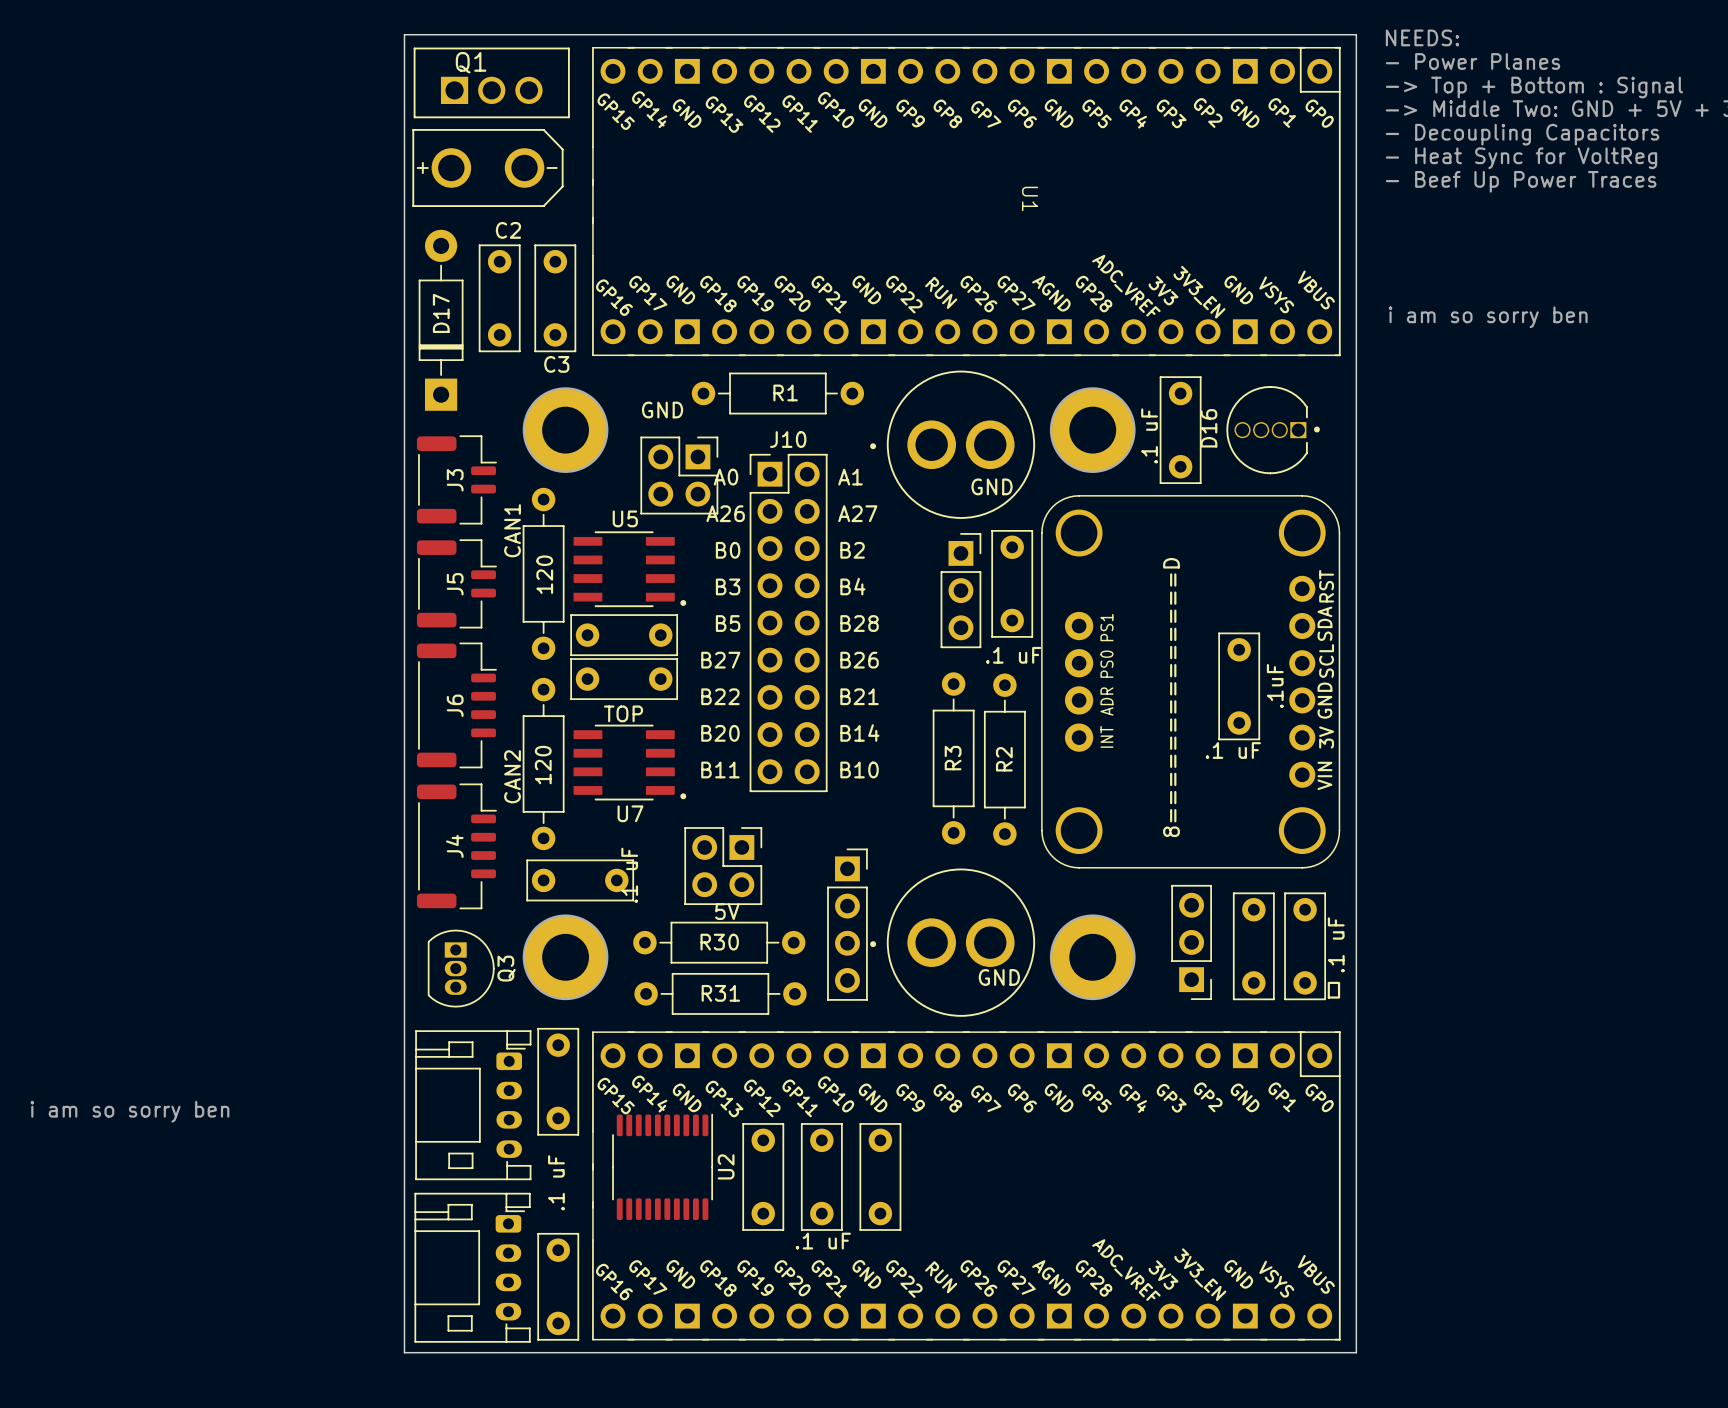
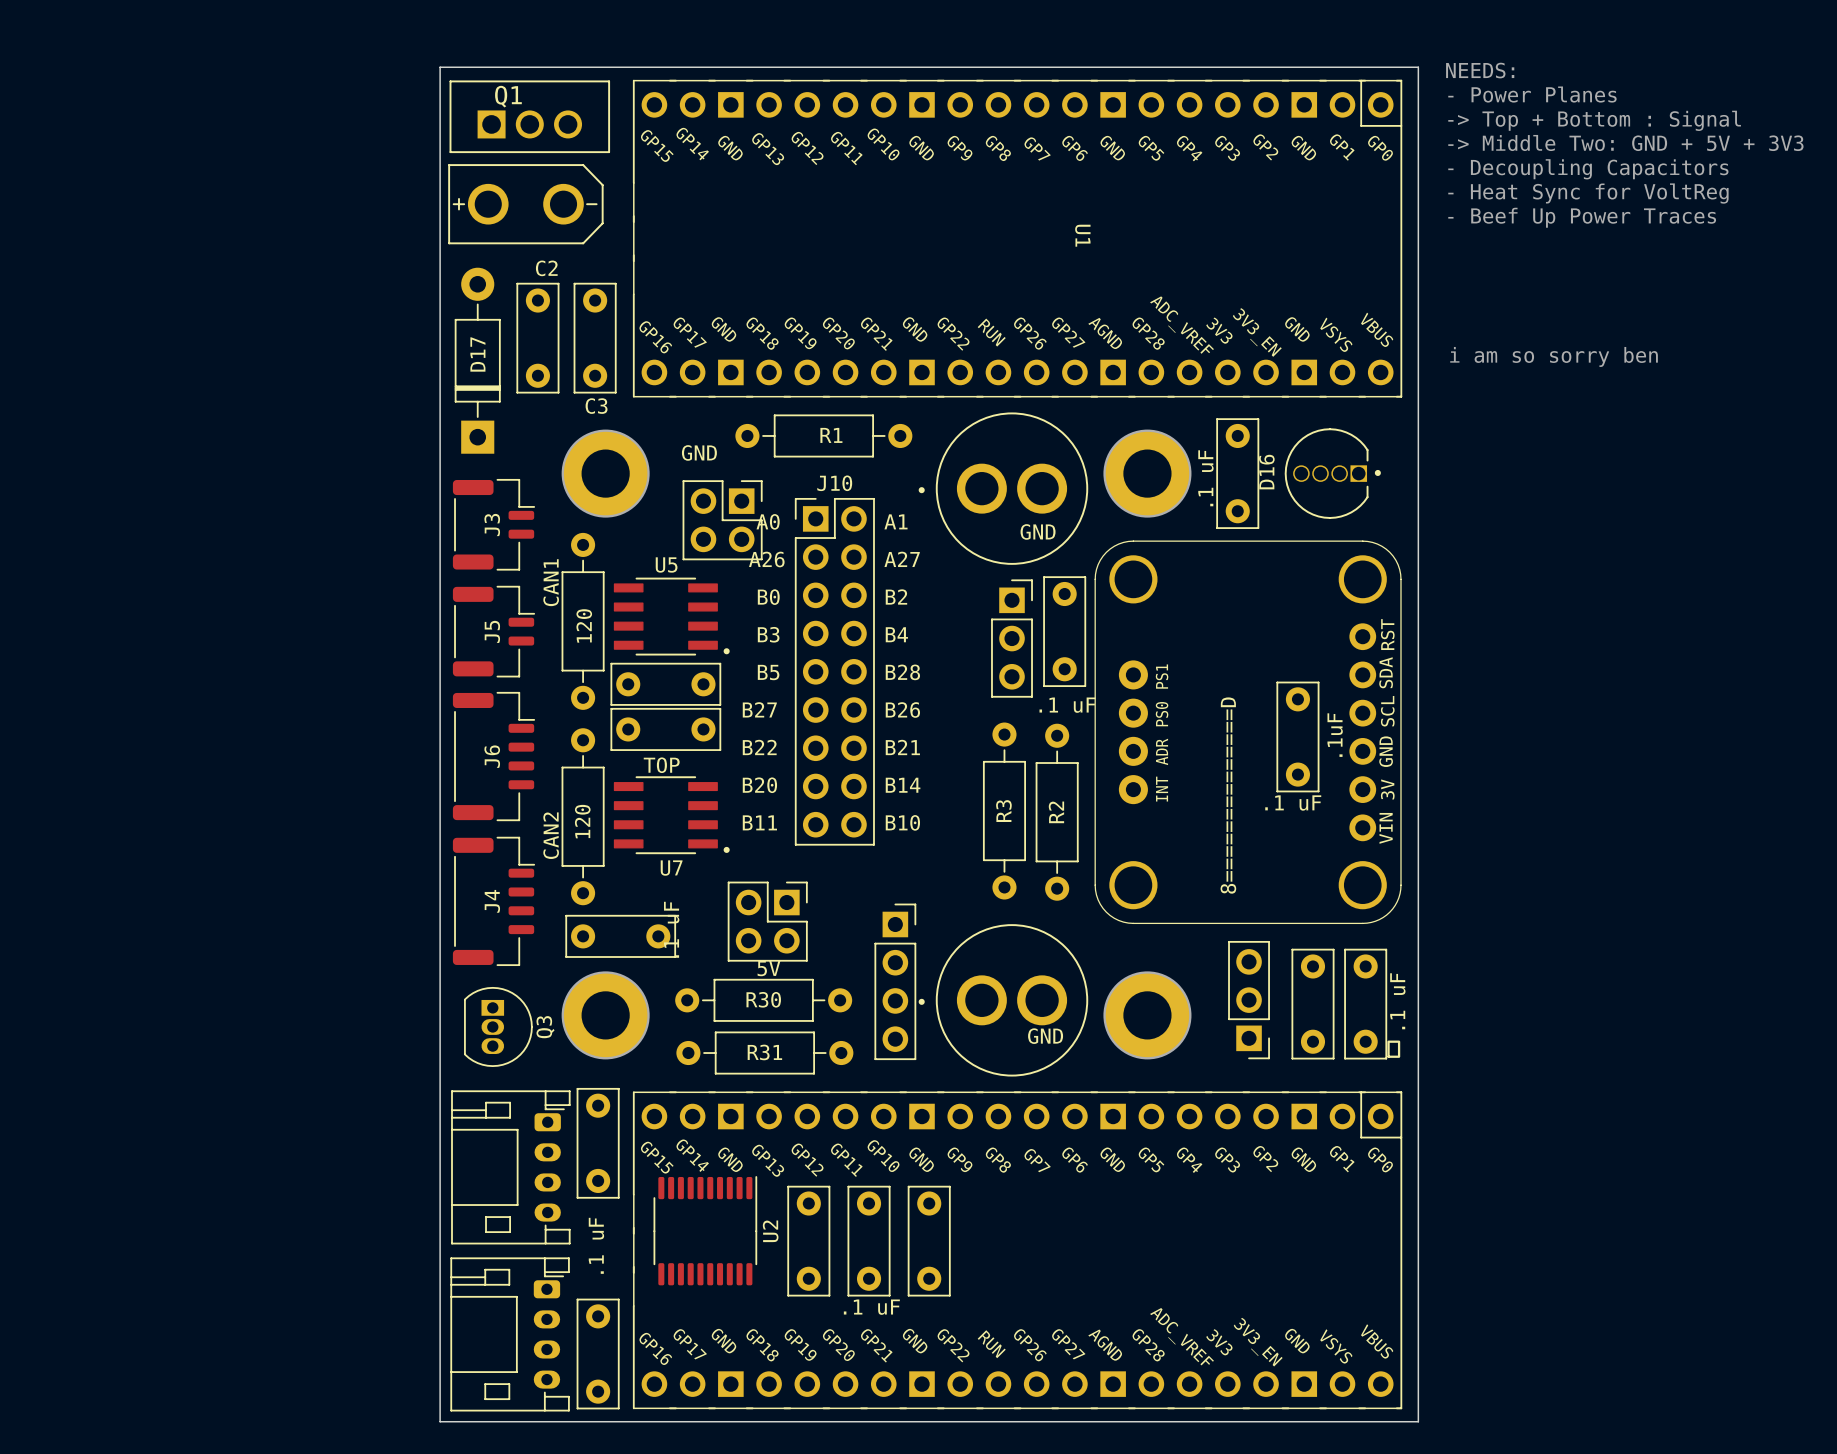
text: i am so sorry ben (129, 1111) -> none

